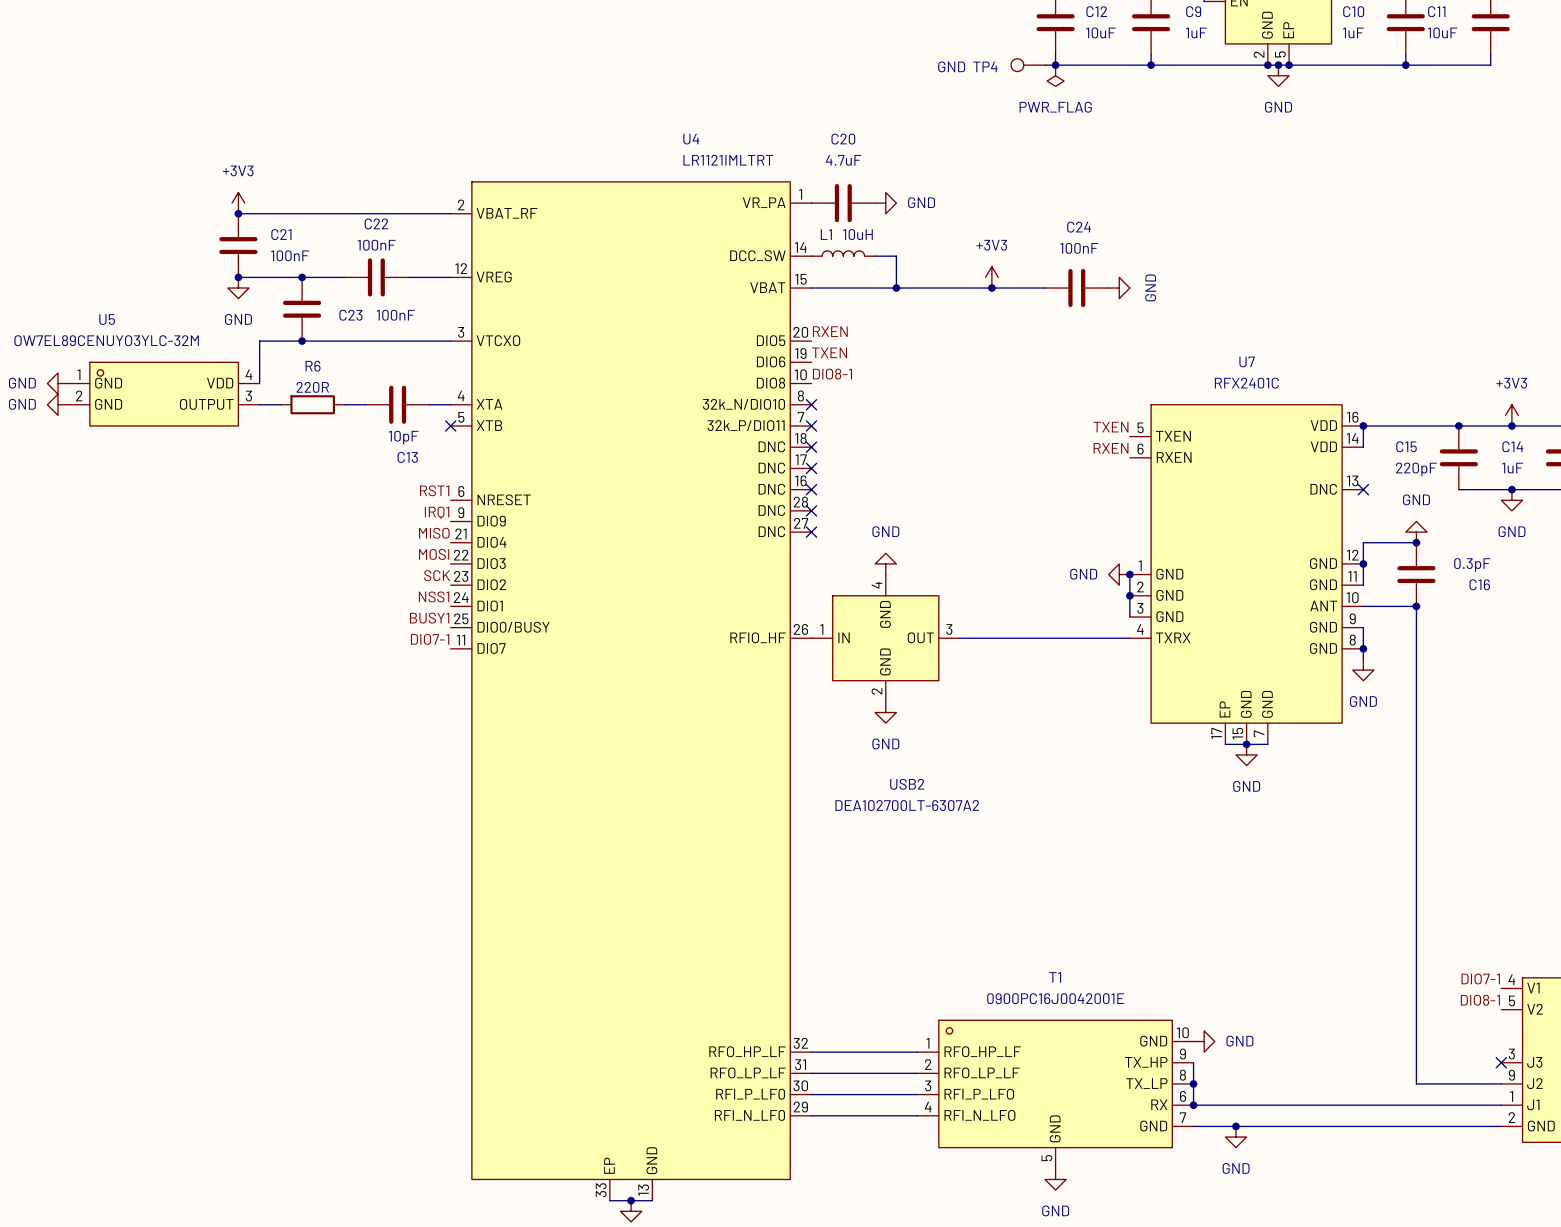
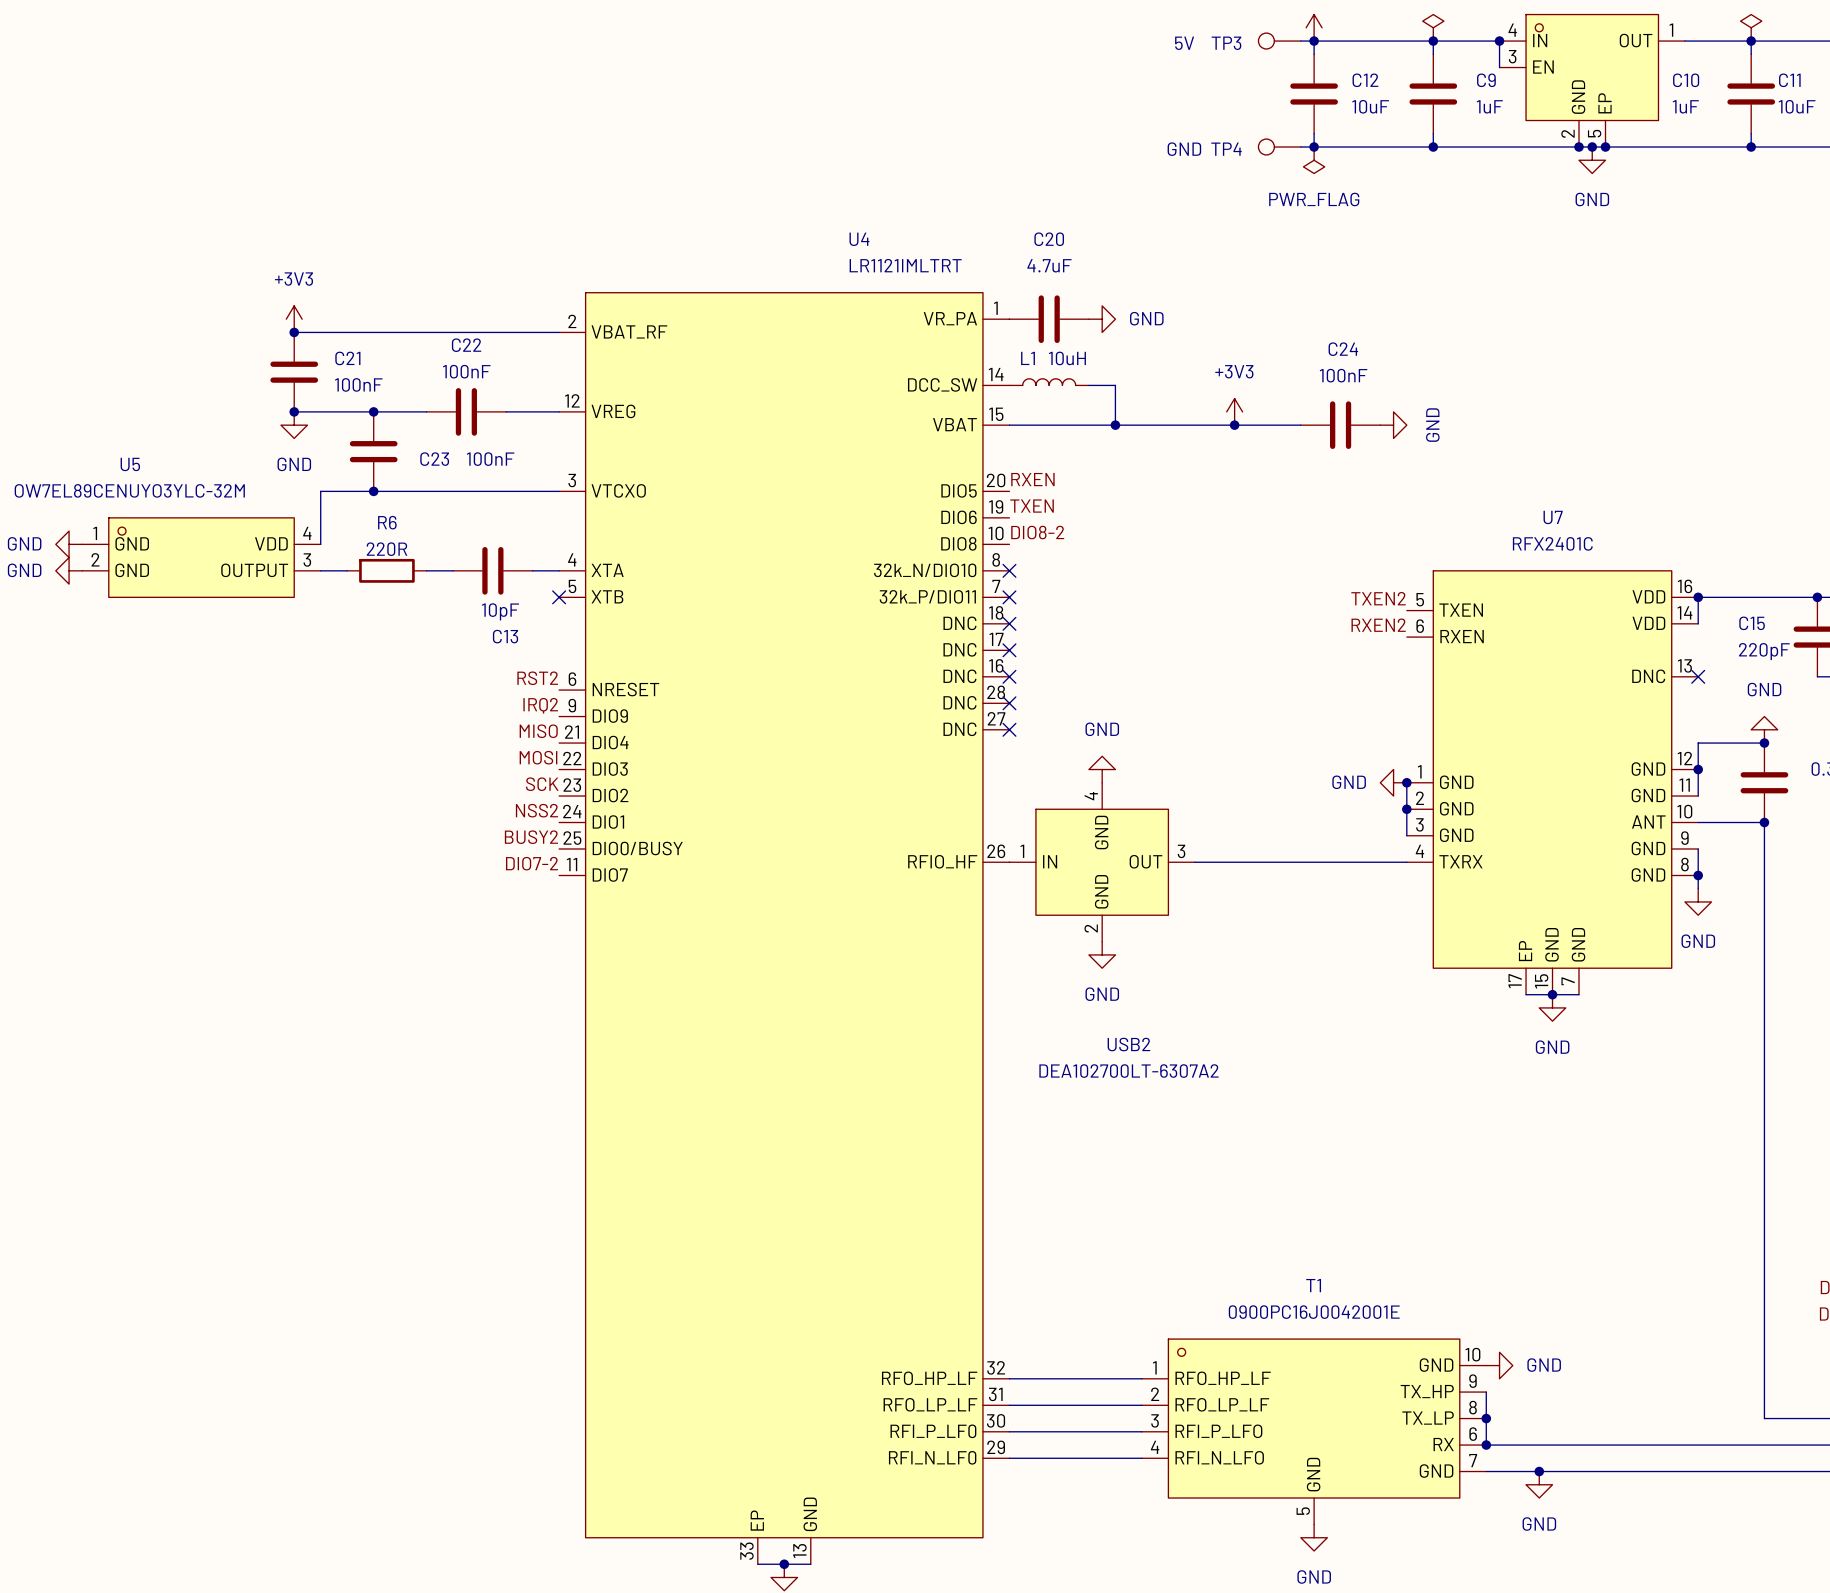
label: DIO8-1 (832, 374) -> DIO8-2 (1037, 532)
label: TXEN (1111, 427) -> TXEN2 (1378, 598)
label: RXEN (1111, 448) -> RXEN2 (1378, 625)
label: RST1 (434, 490) -> RST2 (537, 678)
label: IRQ1 (437, 512) -> IRQ2 (540, 705)
label: NSS1 (434, 596) -> NSS2 (536, 810)
label: BUSY1 (429, 618) -> BUSY2 (531, 837)
label: DIO7-1 (430, 639) -> DIO7-2 (532, 863)

